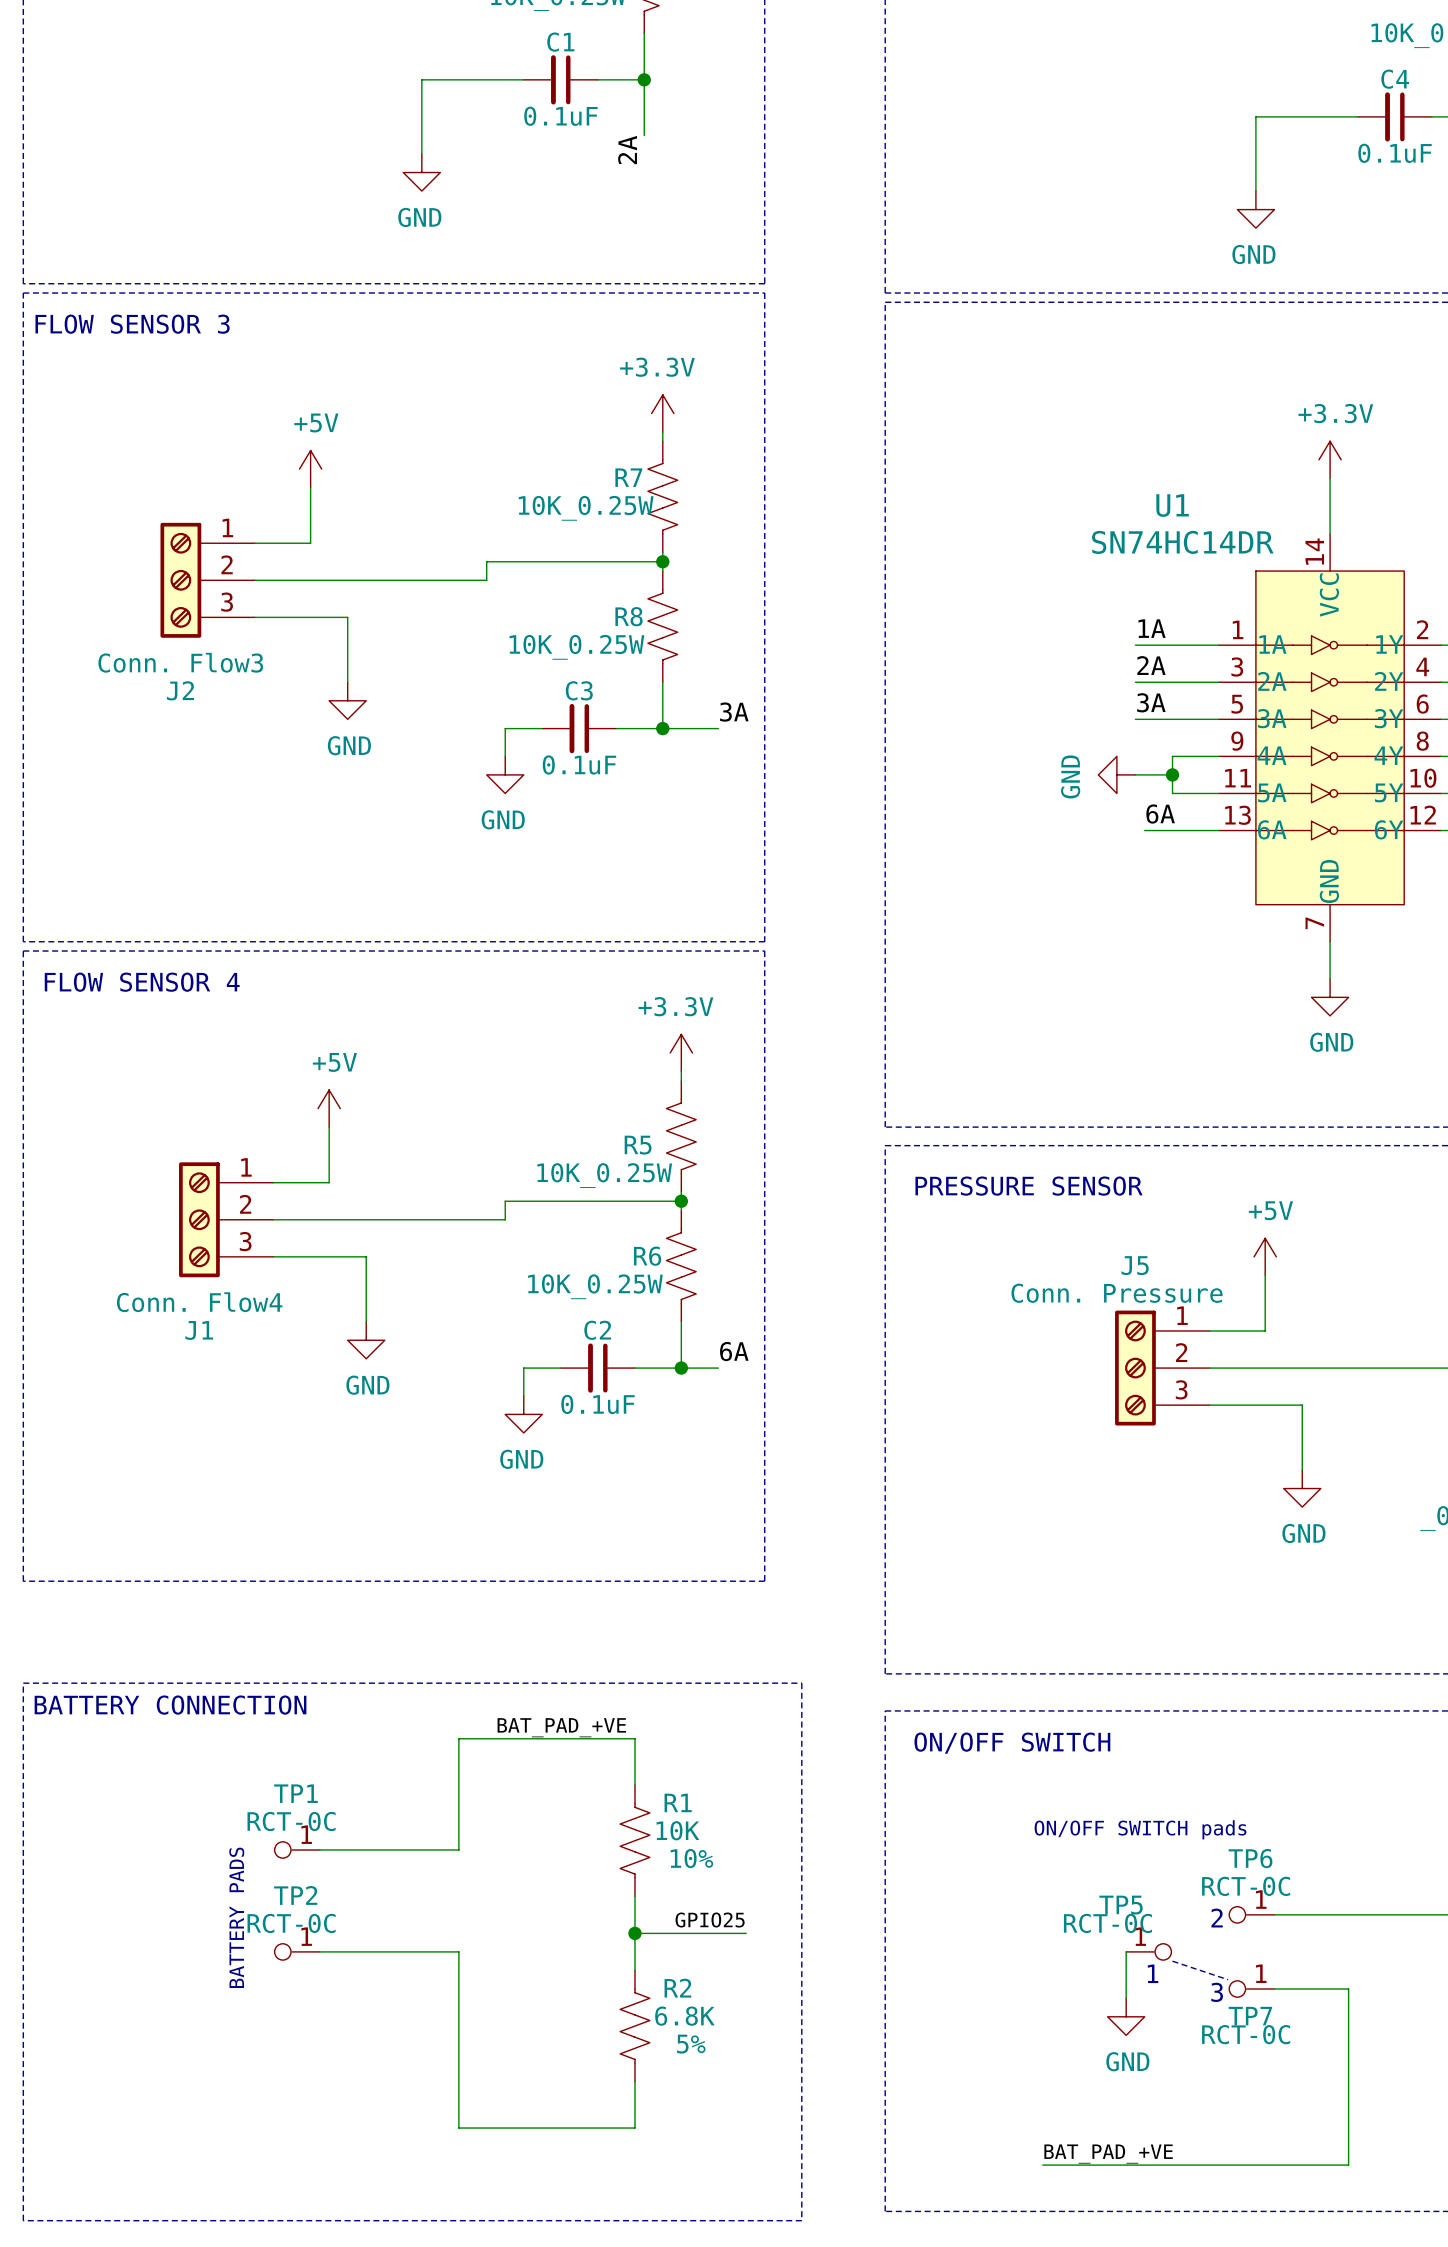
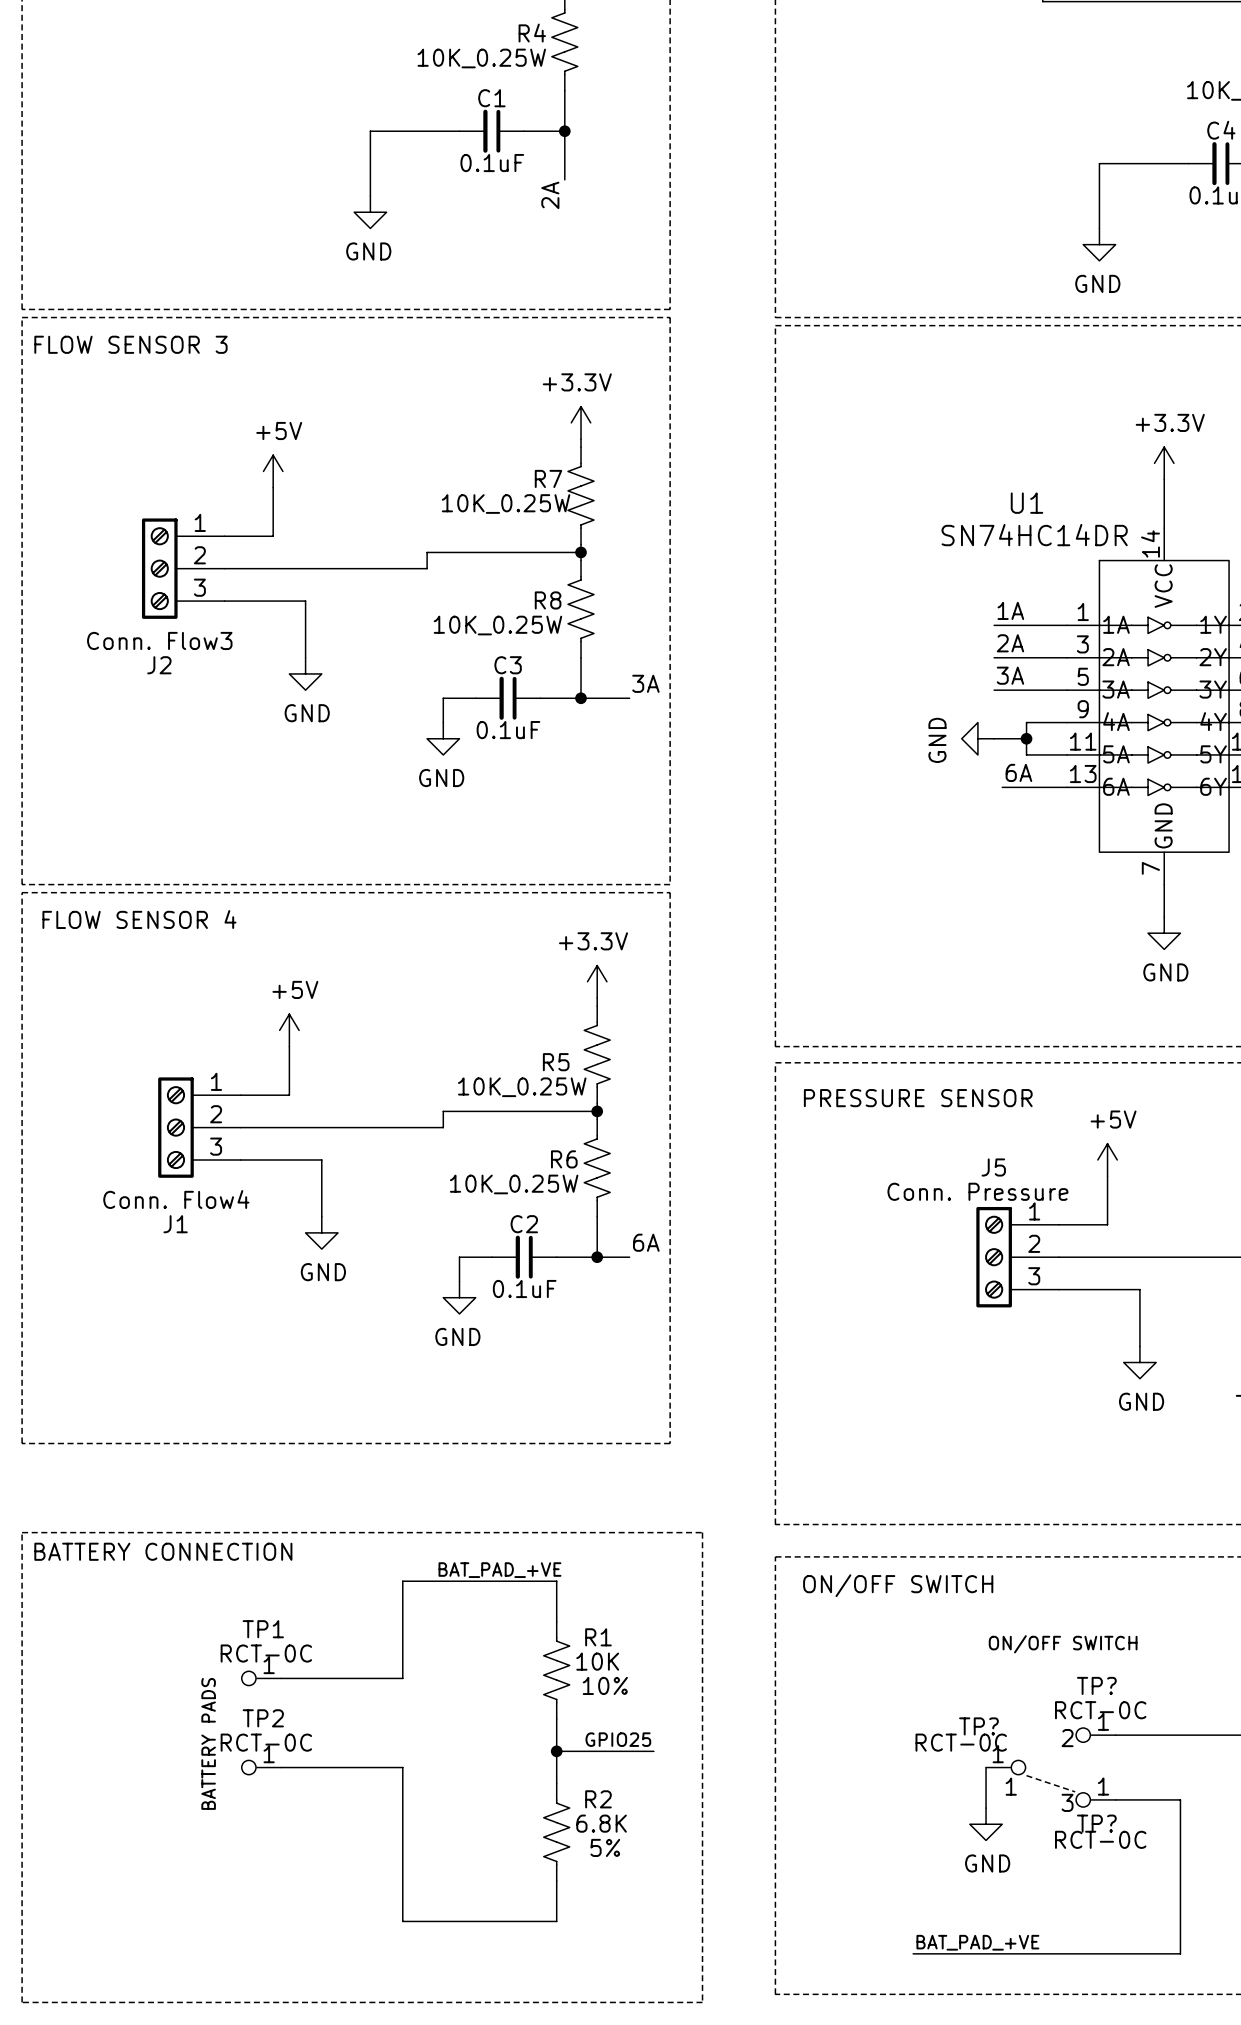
text: ON/OFF SWITCH pads (1140, 1829) -> ON/OFF SWITCH (1063, 1644)
TP6 name: TP6 (1250, 1858) -> TP? (1096, 1685)
TP5 name: TP5 (1121, 1905) -> TP? (978, 1726)
TP7 name: TP7 (1250, 2016) -> TP? (1096, 1823)

